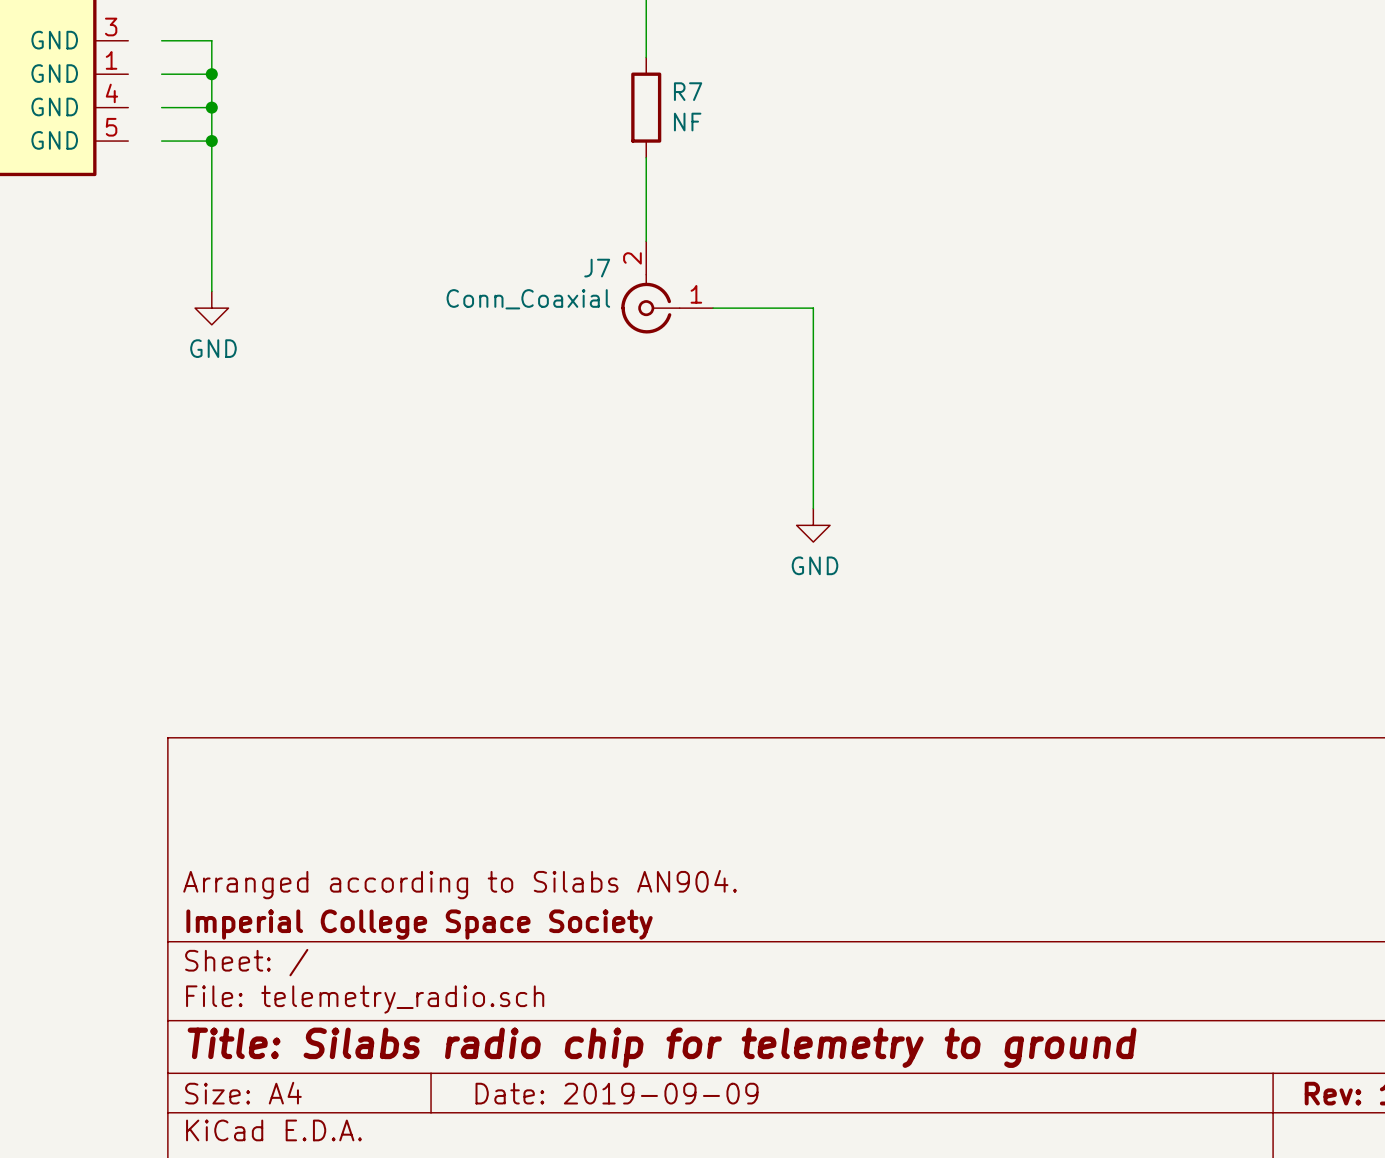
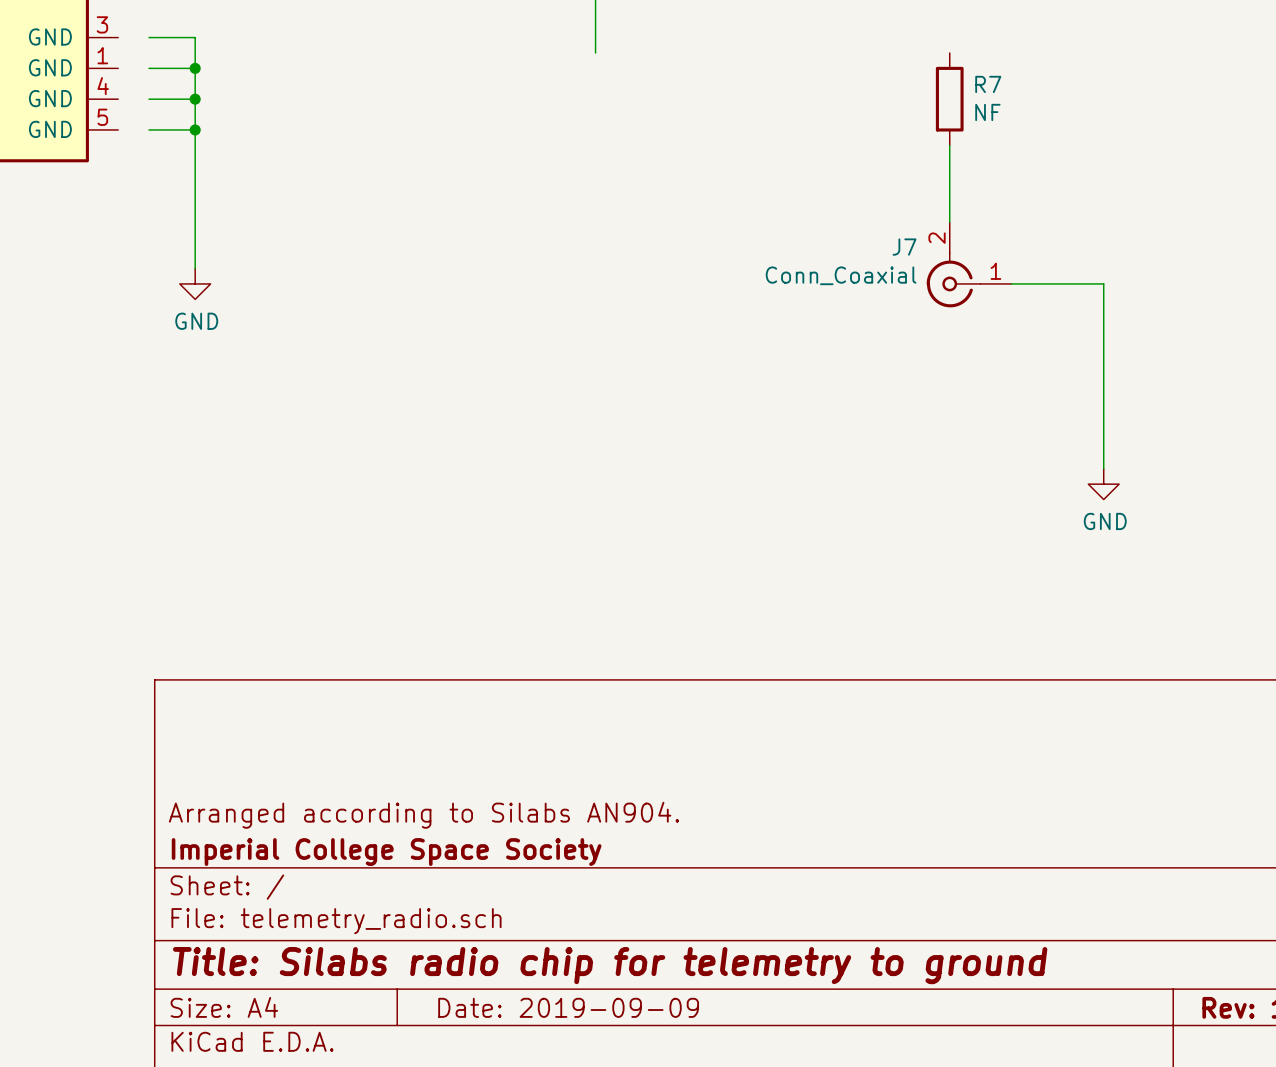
R7 position: (646, 107) -> (949, 99)
wire: (646, 157) (646, 241) -> none
wire: none -> (949, 145) (949, 222)
J7 position: (667, 287) -> (968, 264)
wire: (713, 308) (813, 308) (813, 508) -> none
wire: none -> (1011, 283) (1103, 283) (1103, 468)
power symbol: GND (813, 525) -> none
power symbol: none -> GND (1103, 484)

